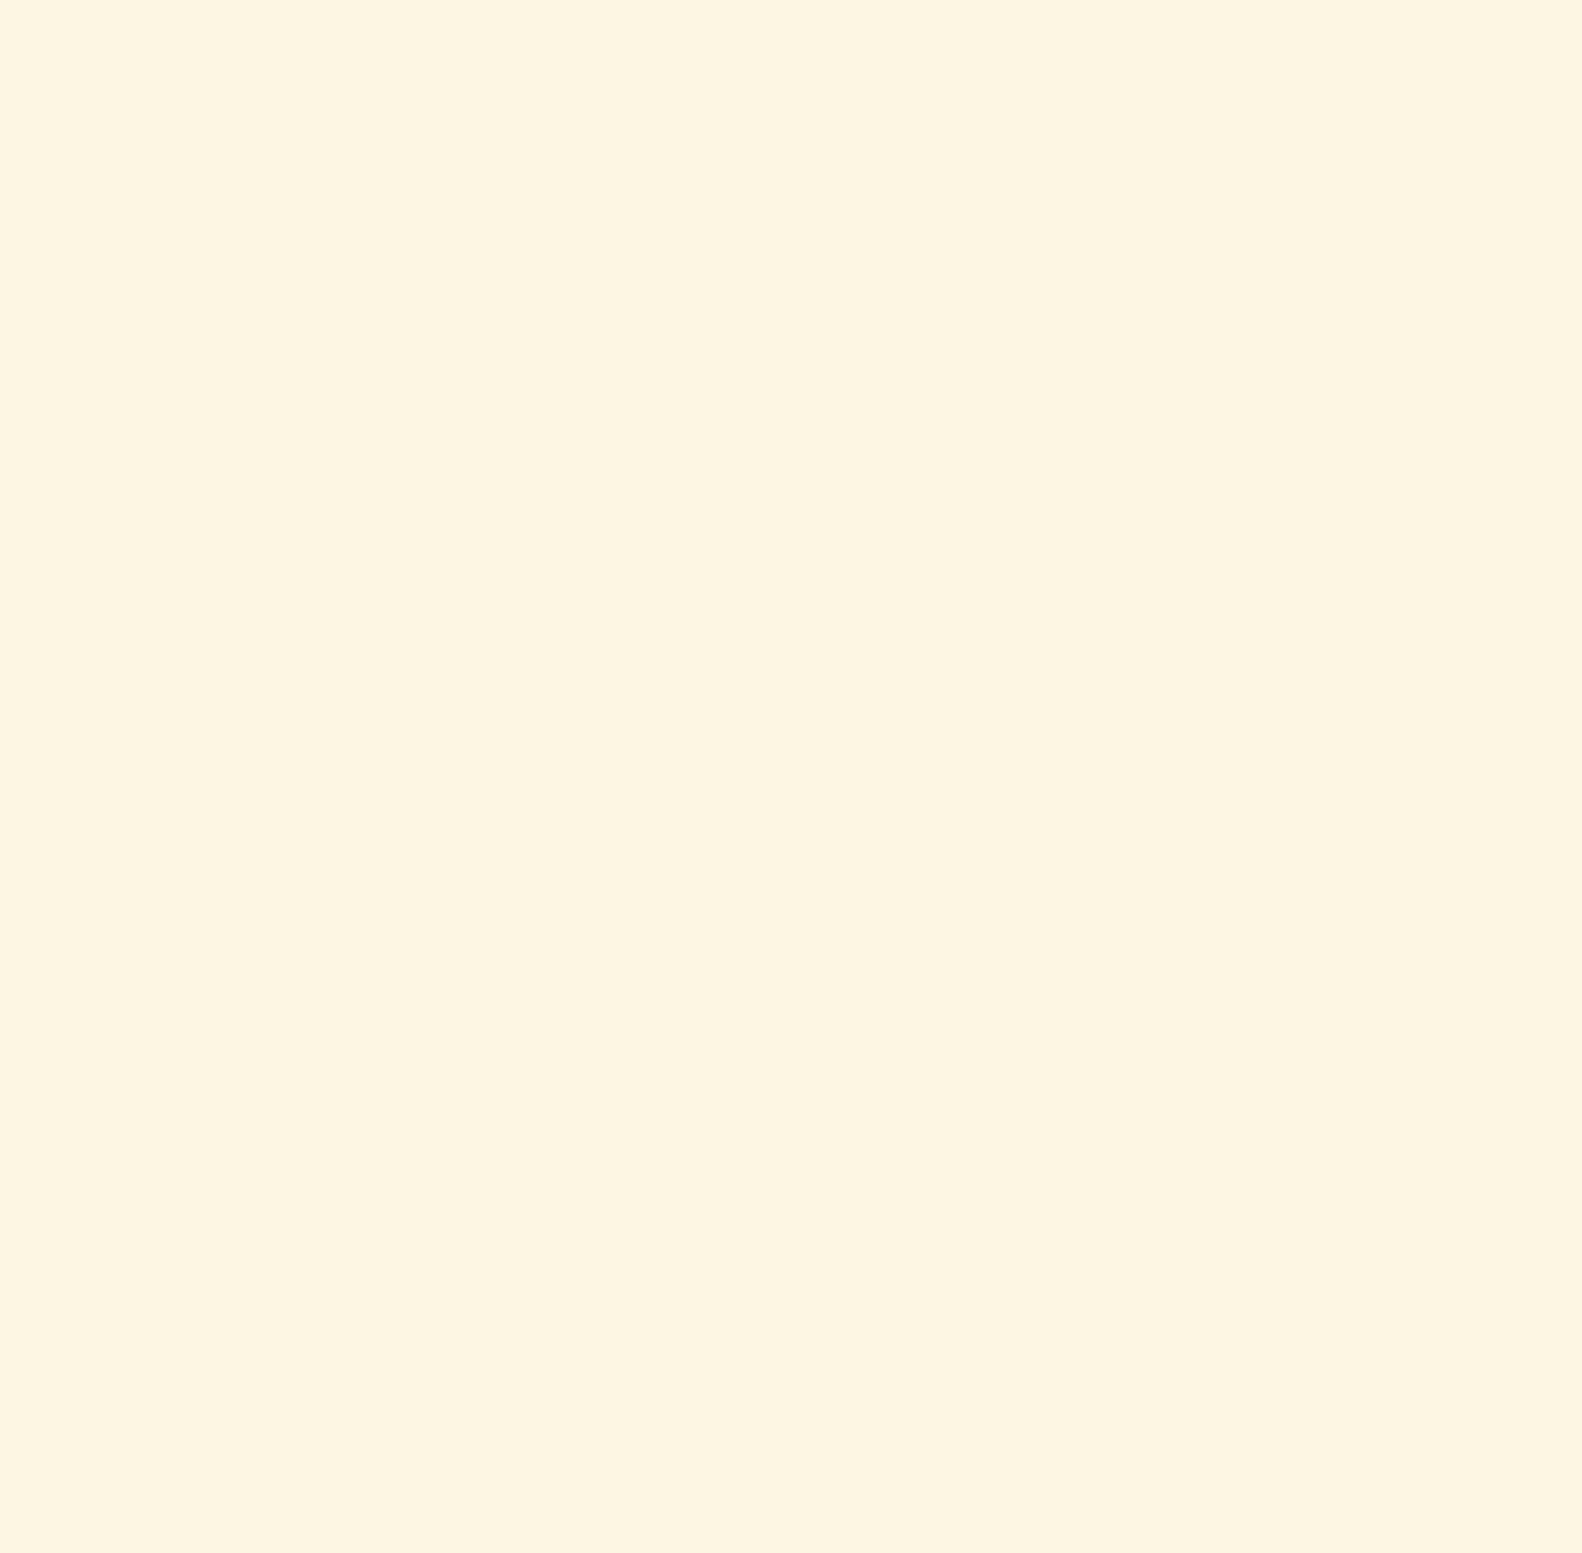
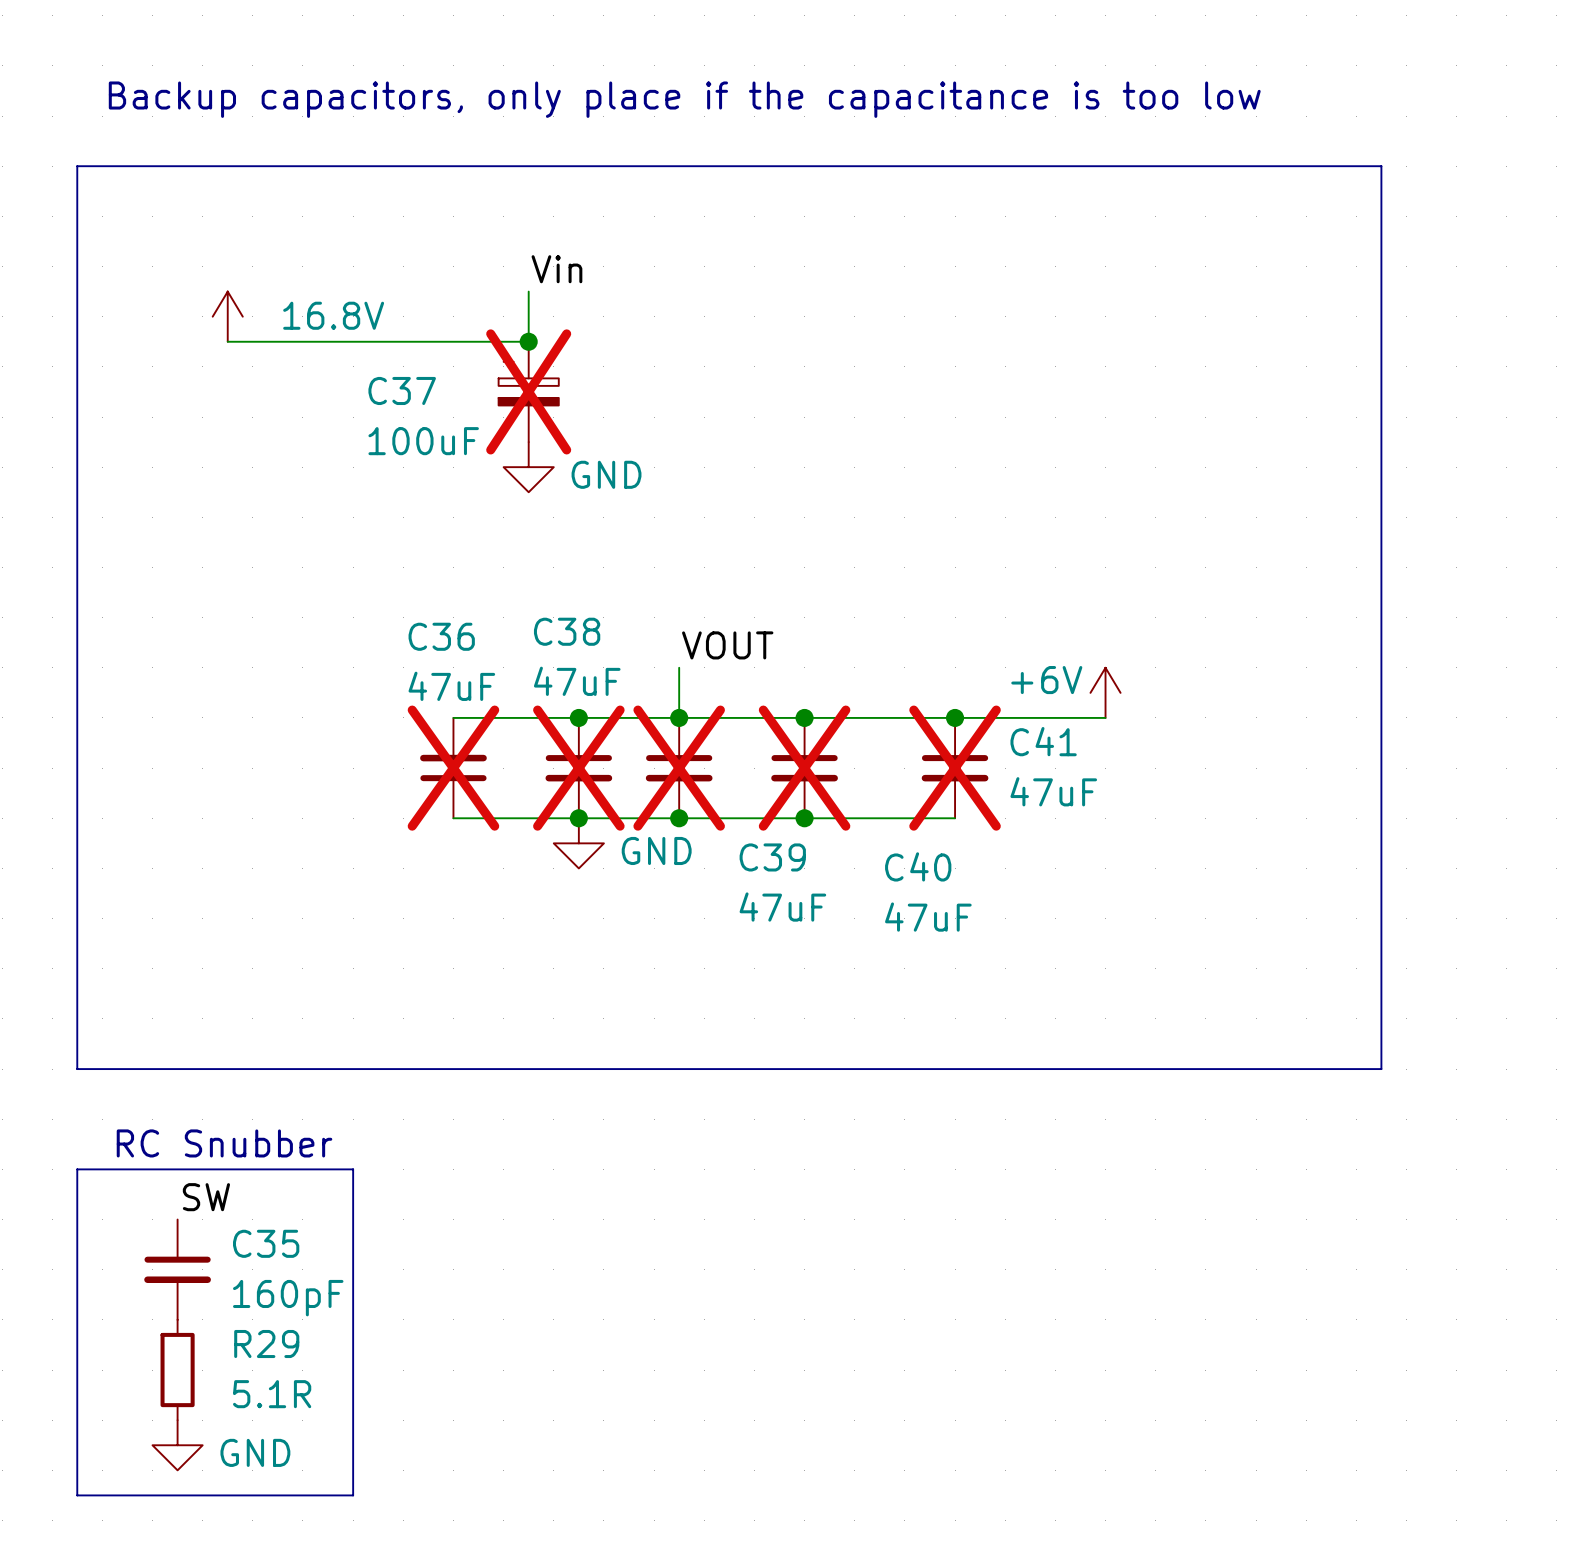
text: none -> Backup capacitors, only place if the capacitance is too low (684, 99)
line: none -> (77, 166) (77, 1069) (1381, 1069) (1381, 166) (77, 166)
label: none -> Vin (556, 269)
wire: none -> (528, 291) (528, 341) (227, 341)
power symbol: none -> 16.8V (227, 316)
junction: none -> (528, 341)
C37: none -> 100uF (528, 391)
power symbol: none -> GND (528, 467)
label: none -> VOUT (727, 645)
wire: none -> (679, 667) (679, 717)
power symbol: none -> +6V (1105, 692)
wire: none -> (453, 717) (1105, 717)
junction: none -> (578, 717)
junction: none -> (679, 717)
junction: none -> (804, 717)
junction: none -> (955, 717)
C36: none -> 47uF (453, 768)
C38: none -> 47uF (578, 768)
C39: none -> 47uF (679, 768)
C40: none -> 47uF (804, 768)
C41: none -> 47uF (955, 768)
wire: none -> (453, 818) (955, 818)
junction: none -> (578, 818)
junction: none -> (679, 818)
junction: none -> (804, 818)
power symbol: none -> GND (578, 843)
text: none -> RC Snubber (224, 1143)
line: none -> (77, 1169) (353, 1169) (353, 1495) (77, 1495) (77, 1169)
label: none -> SW (206, 1197)
C35: none -> 160pF (177, 1269)
R29: none -> 5.1R (177, 1370)
power symbol: none -> GND (177, 1445)

